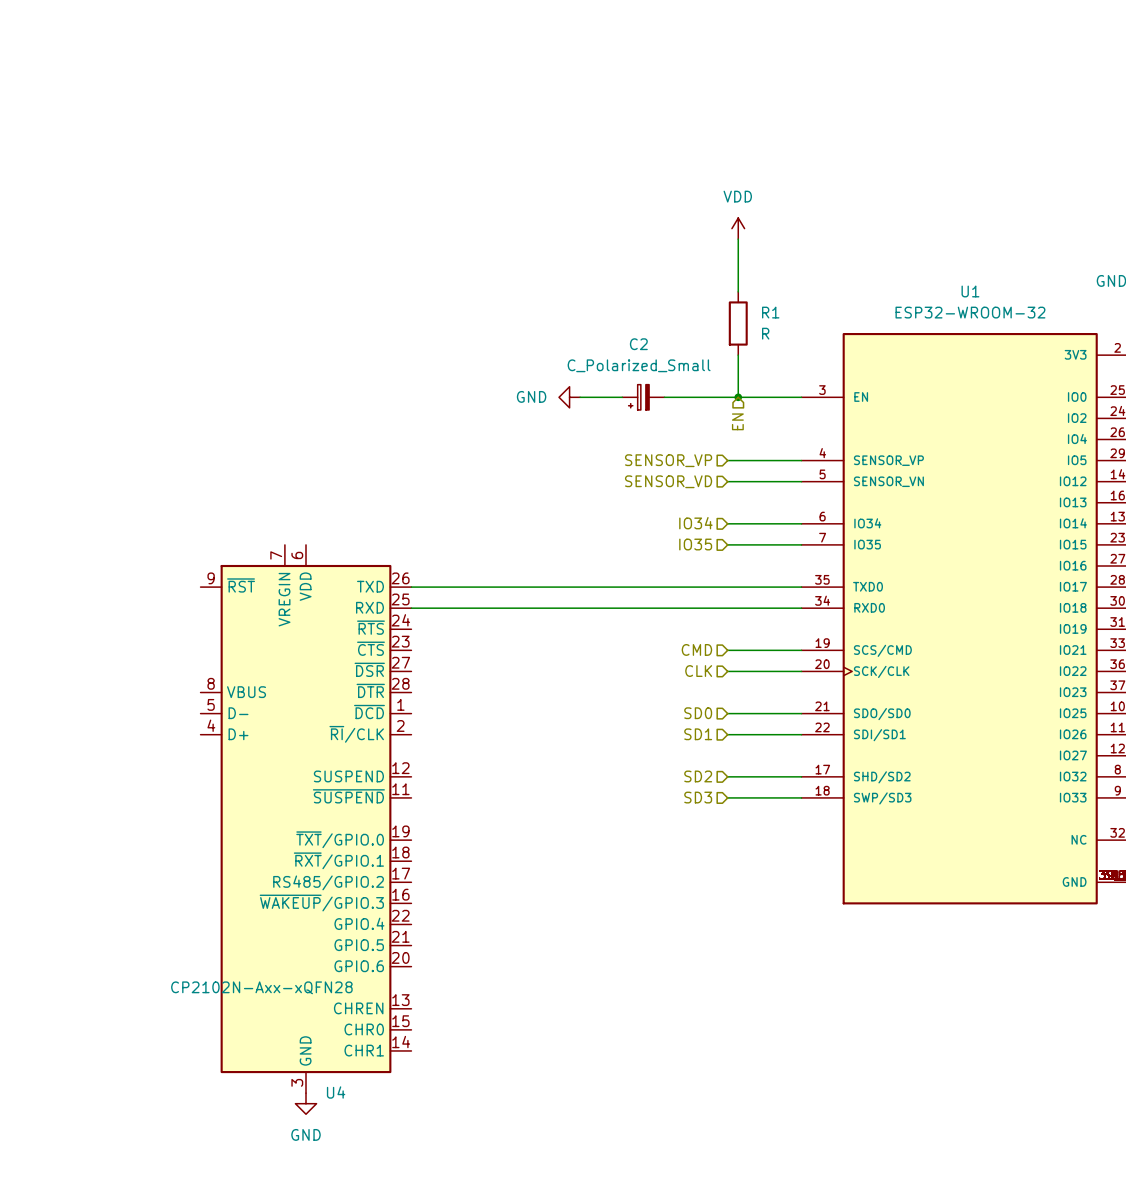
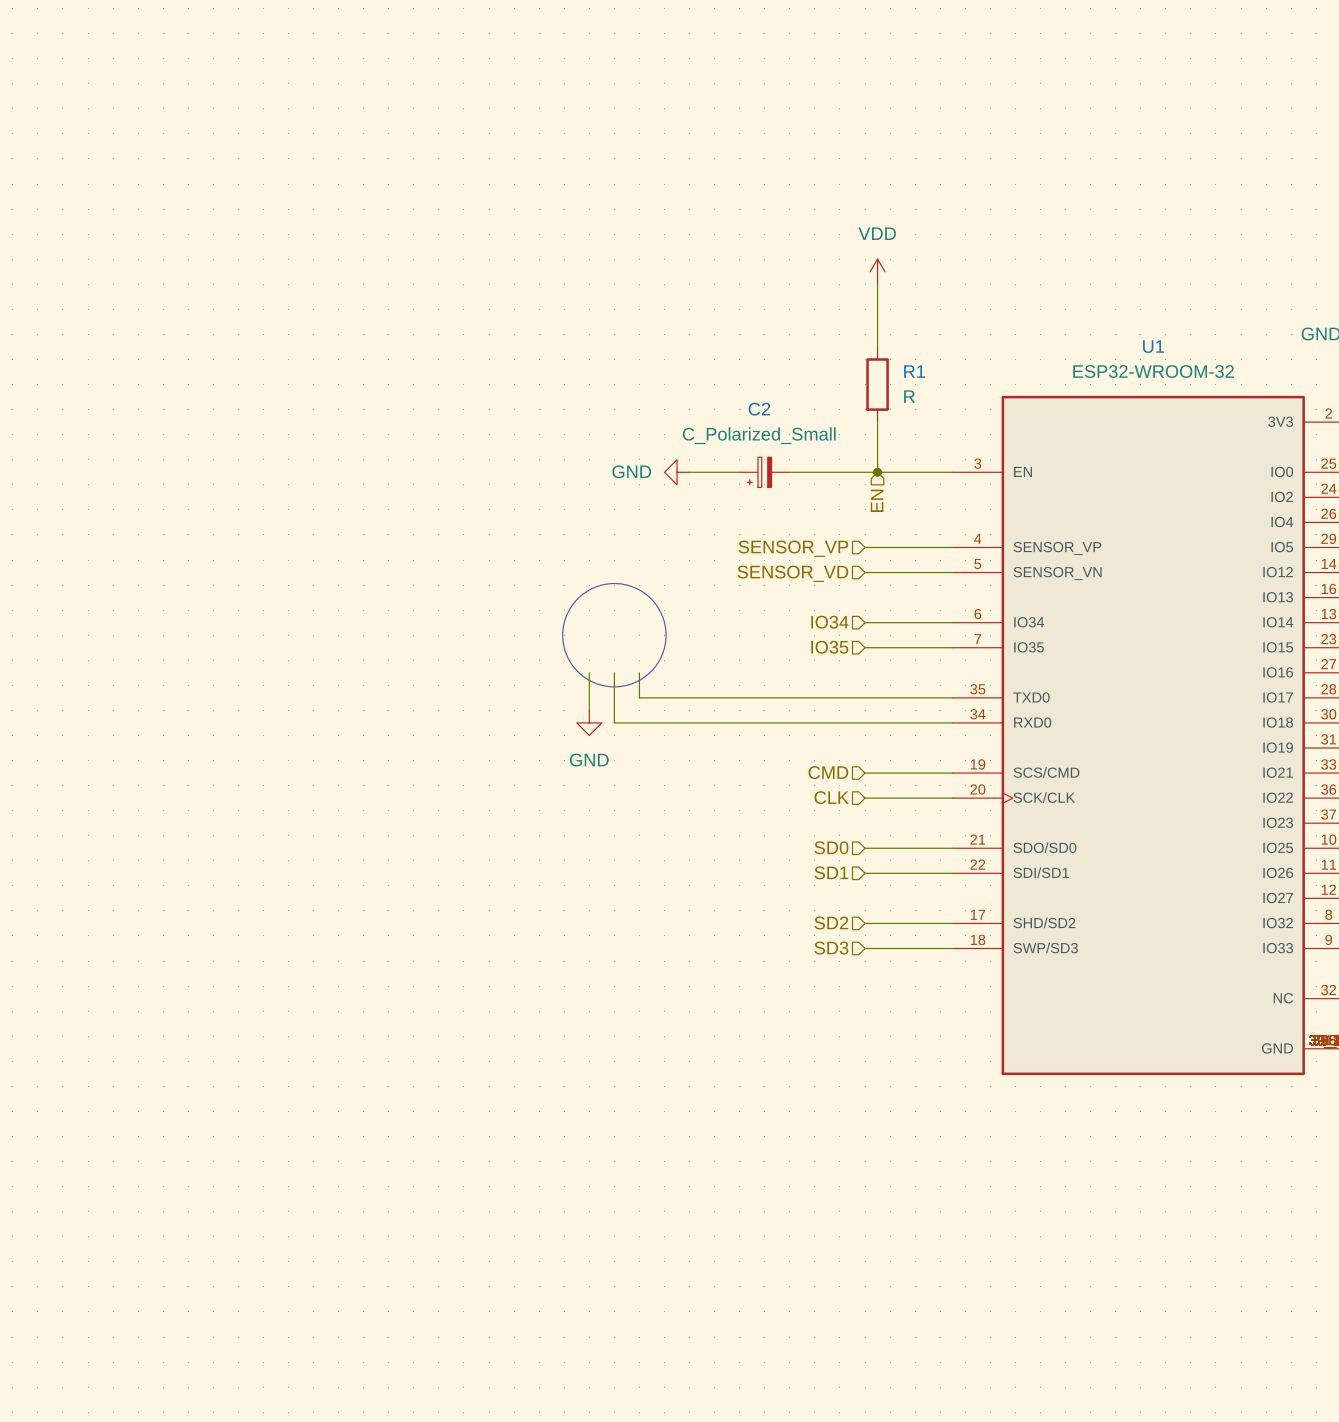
drawing: none -> [562, 583, 667, 687]
wire: none -> (589, 672) (589, 710)
wire: (411, 587) (537, 587) -> (639, 672) (639, 697)
wire: (411, 608) (516, 608) -> (614, 672) (614, 722)
power symbol: none -> GND (589, 722)
U4: CP2102N-Axx-xQFN28 (306, 819) -> none
power symbol: GND (306, 1103) -> none

